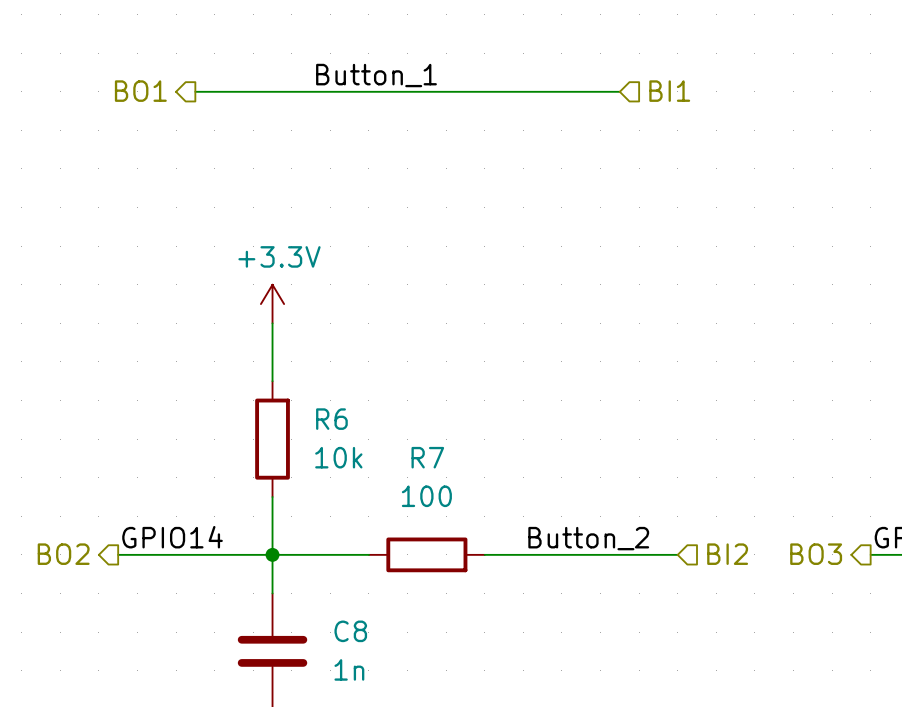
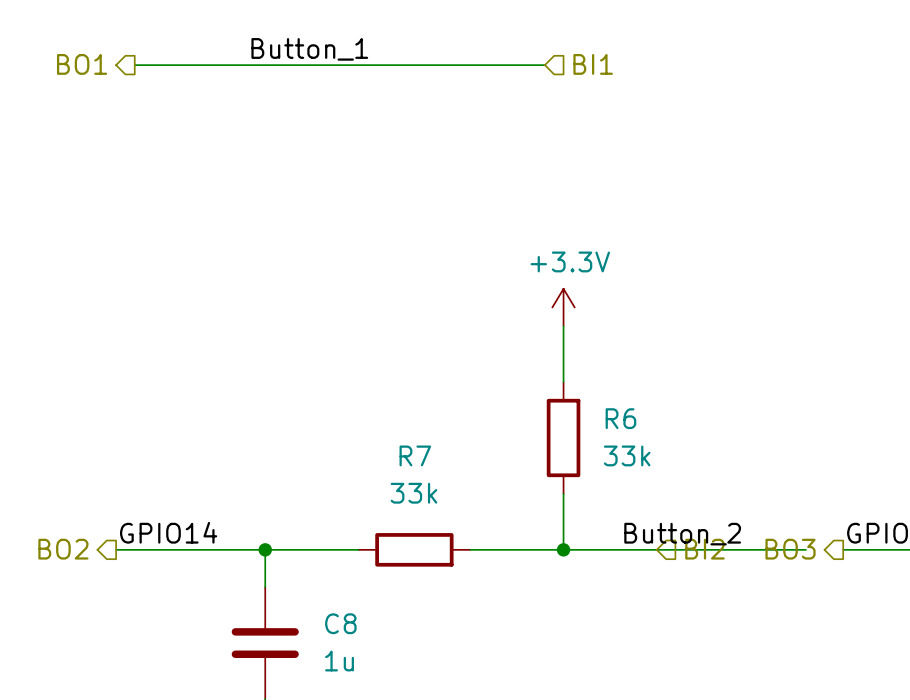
label position: Button_1 (376, 75) -> Button_1 (309, 49)
hierarchical label position: BO1 (140, 91) -> BO1 (82, 64)
wire: (195, 91) (619, 91) -> (134, 65) (544, 65)
hierarchical label position: BI1 (669, 91) -> BI1 (593, 64)
power symbol: +3.3V (272, 304) -> none
power symbol: none -> +3.3V (563, 307)
wire: (272, 323) (272, 381) -> (563, 326) (563, 382)
R6 position: (272, 439) -> (563, 437)
R6 value: 10k (338, 457) -> 33k (627, 455)
R7 value: 100 (426, 496) -> 33k (413, 493)
wire: (272, 497) (272, 554) -> (563, 493) (563, 549)
label position: Button_2 (588, 538) -> Button_2 (682, 534)
junction: none -> (563, 549)
wire: none -> (656, 549) (805, 549)
C8 value: 1n (349, 669) -> 1u (339, 661)

